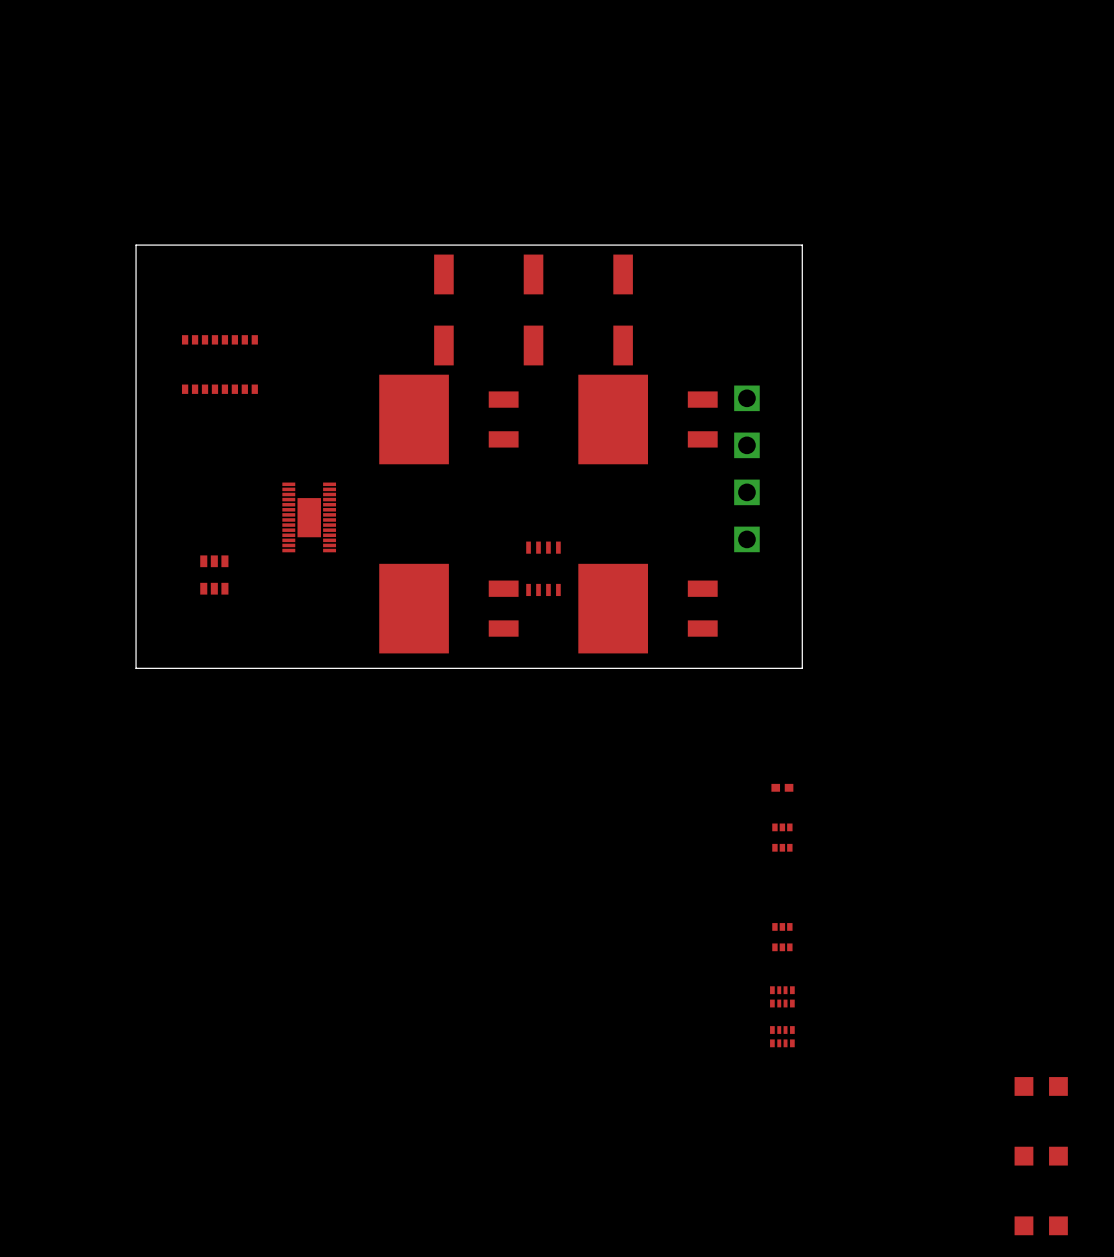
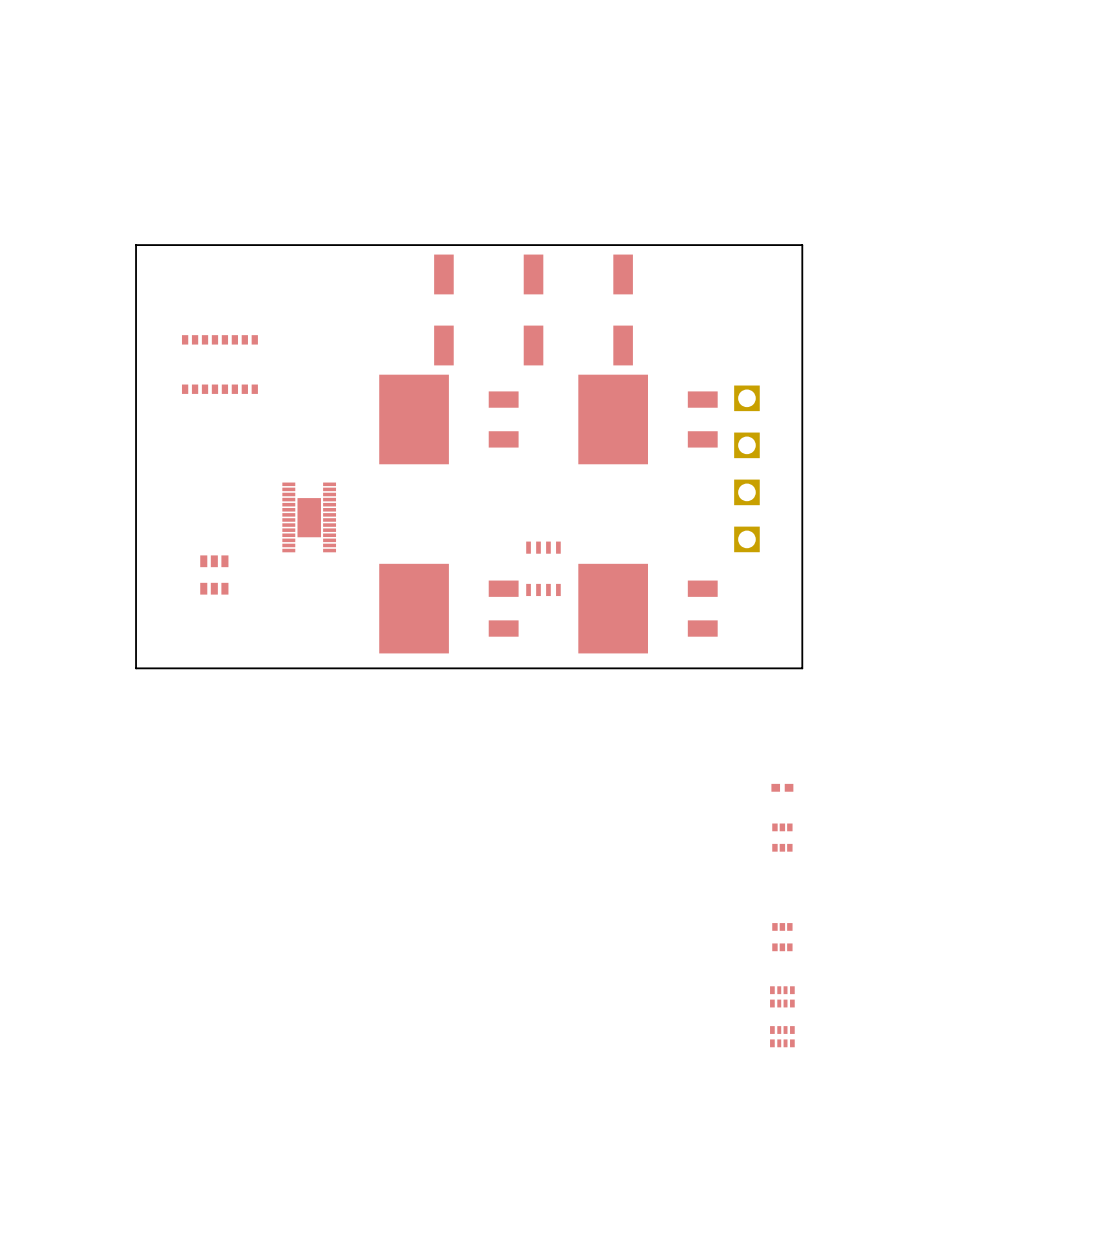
part: (1041, 1086) -> none
part: (1041, 1156) -> none
part: (1041, 1225) -> none

